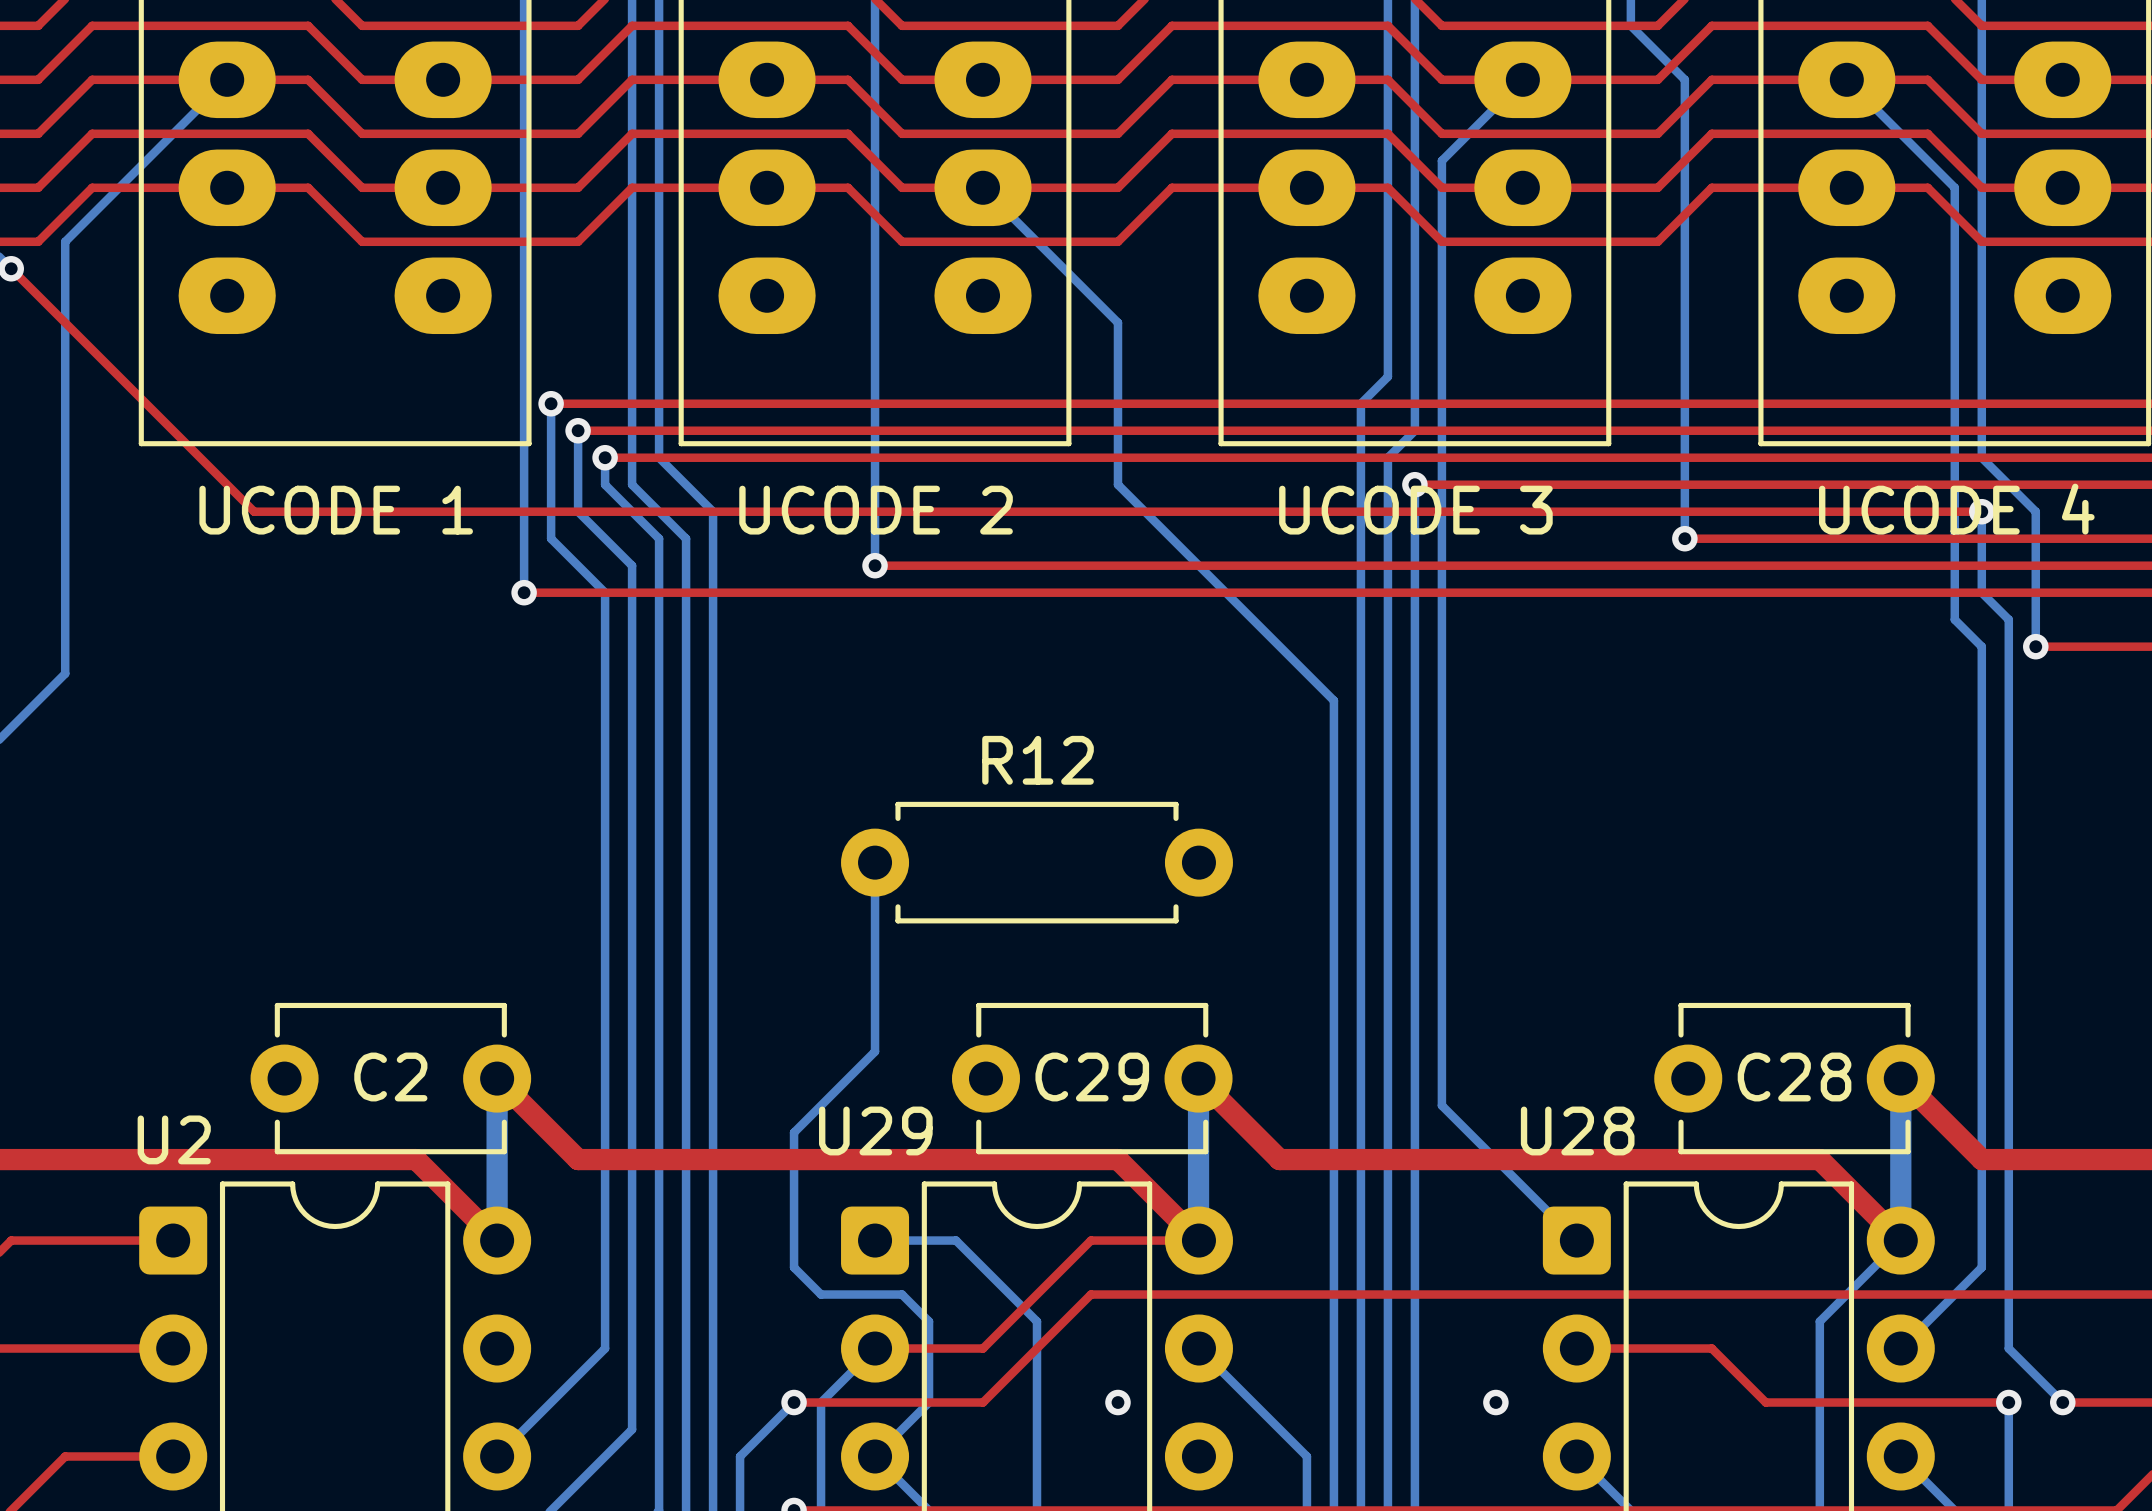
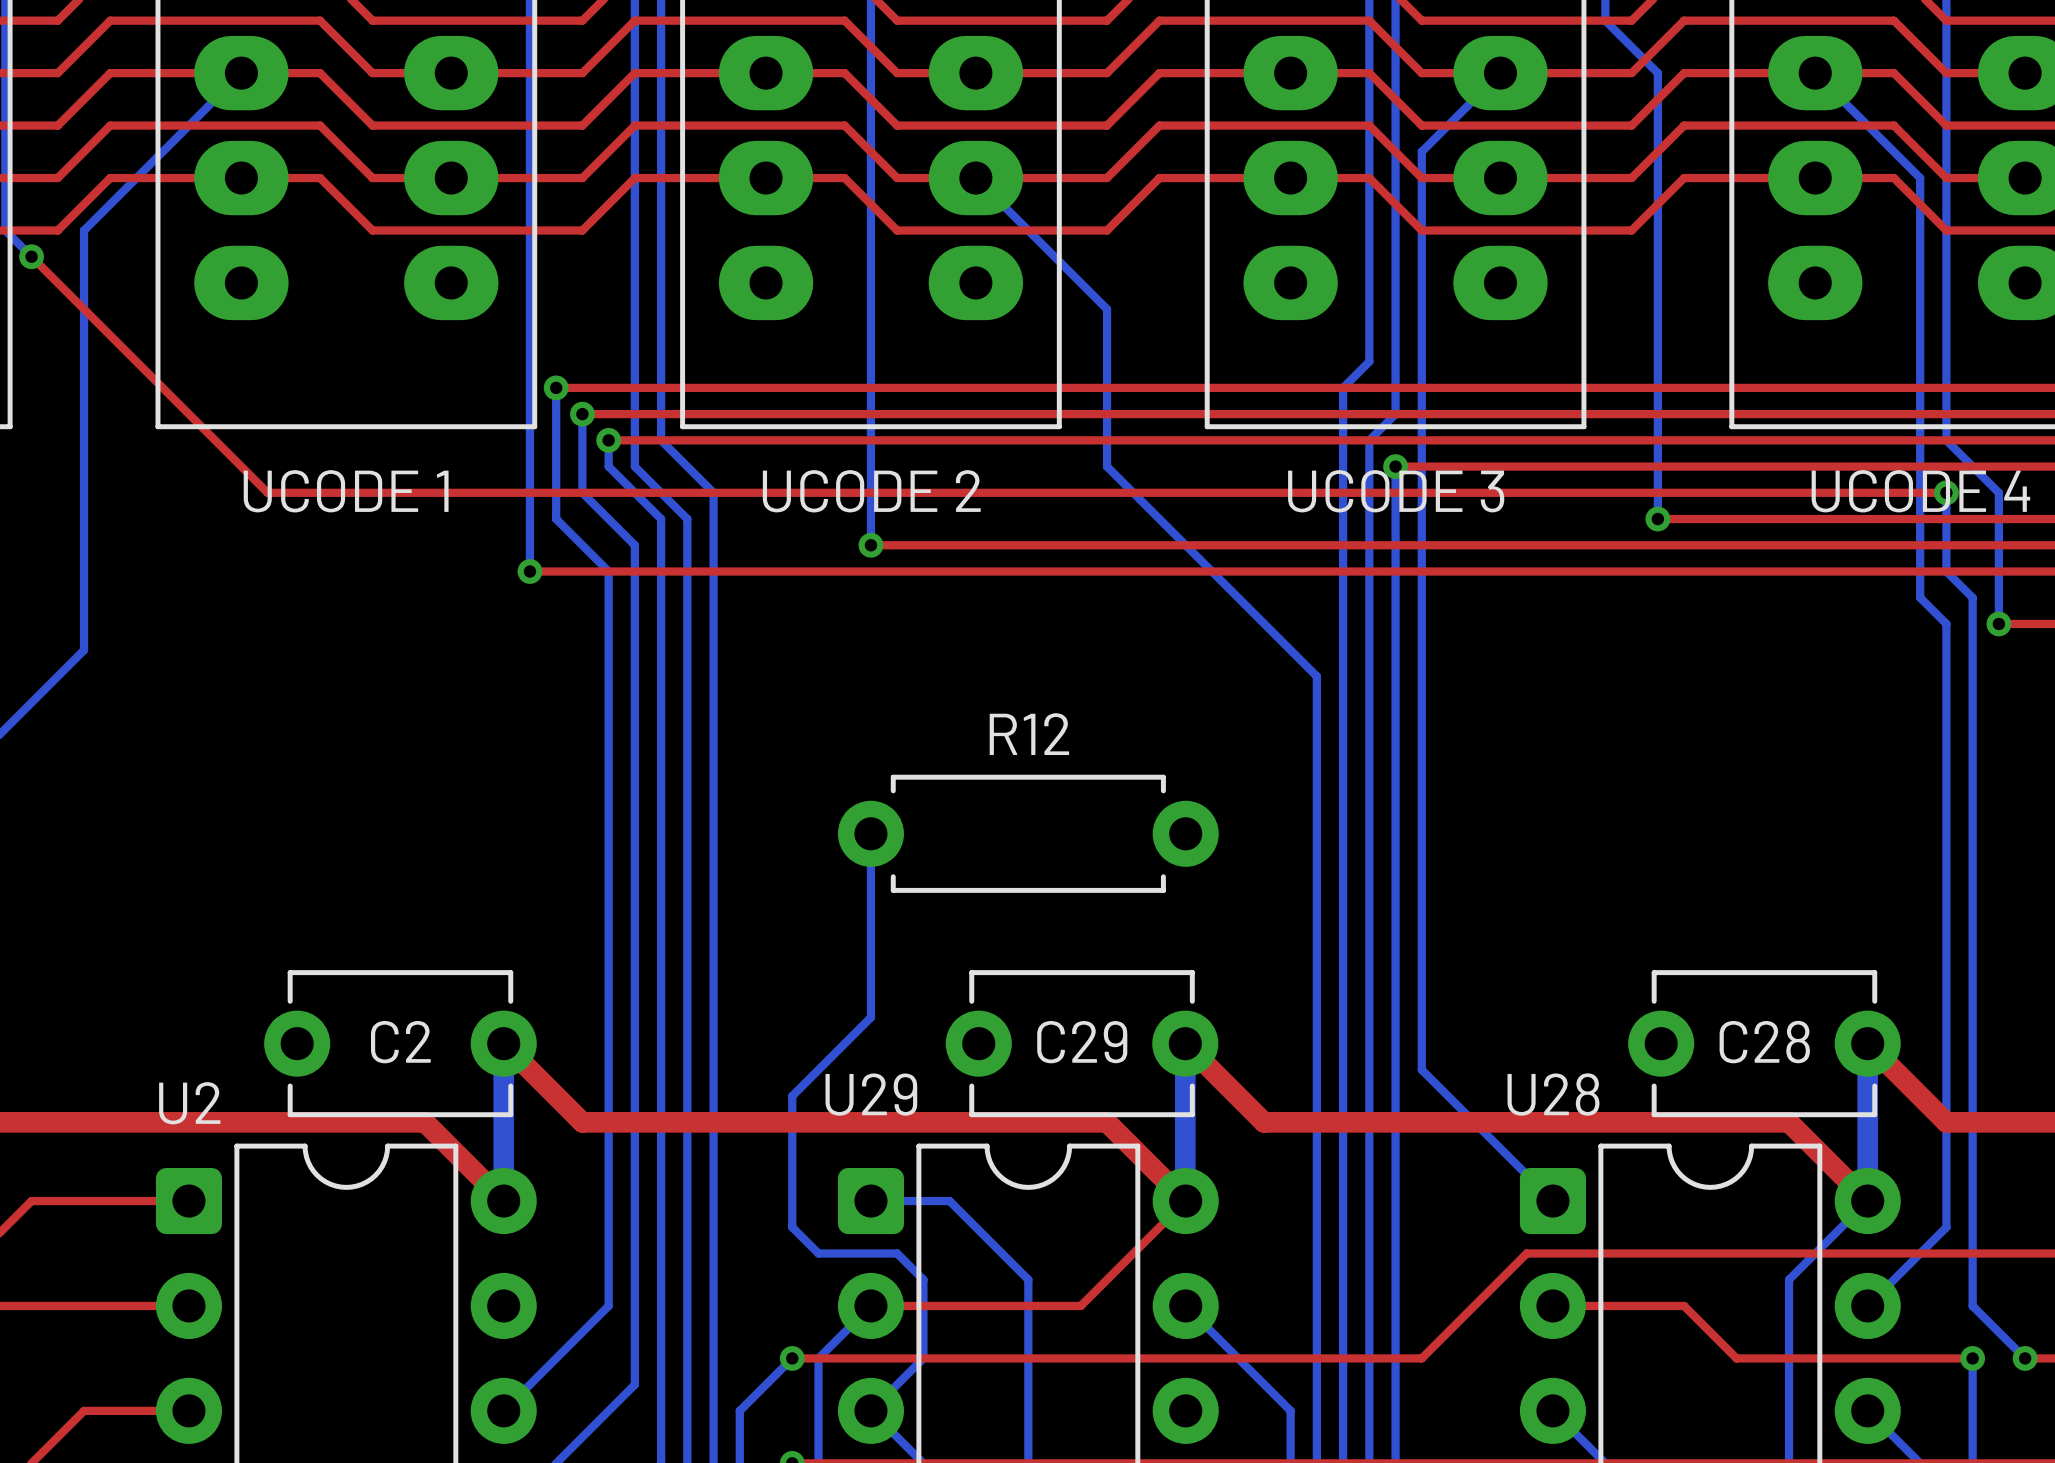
top track: (1198, 1240) (1090, 1240) (983, 1348) -> (1185, 1201) (1080, 1305) (975, 1305)
top track: (1549, 1294) (1090, 1294) (983, 1402) -> (1526, 1253) (1421, 1358) (975, 1358)
via: (1117, 1402) -> none
via: (1495, 1402) -> none

